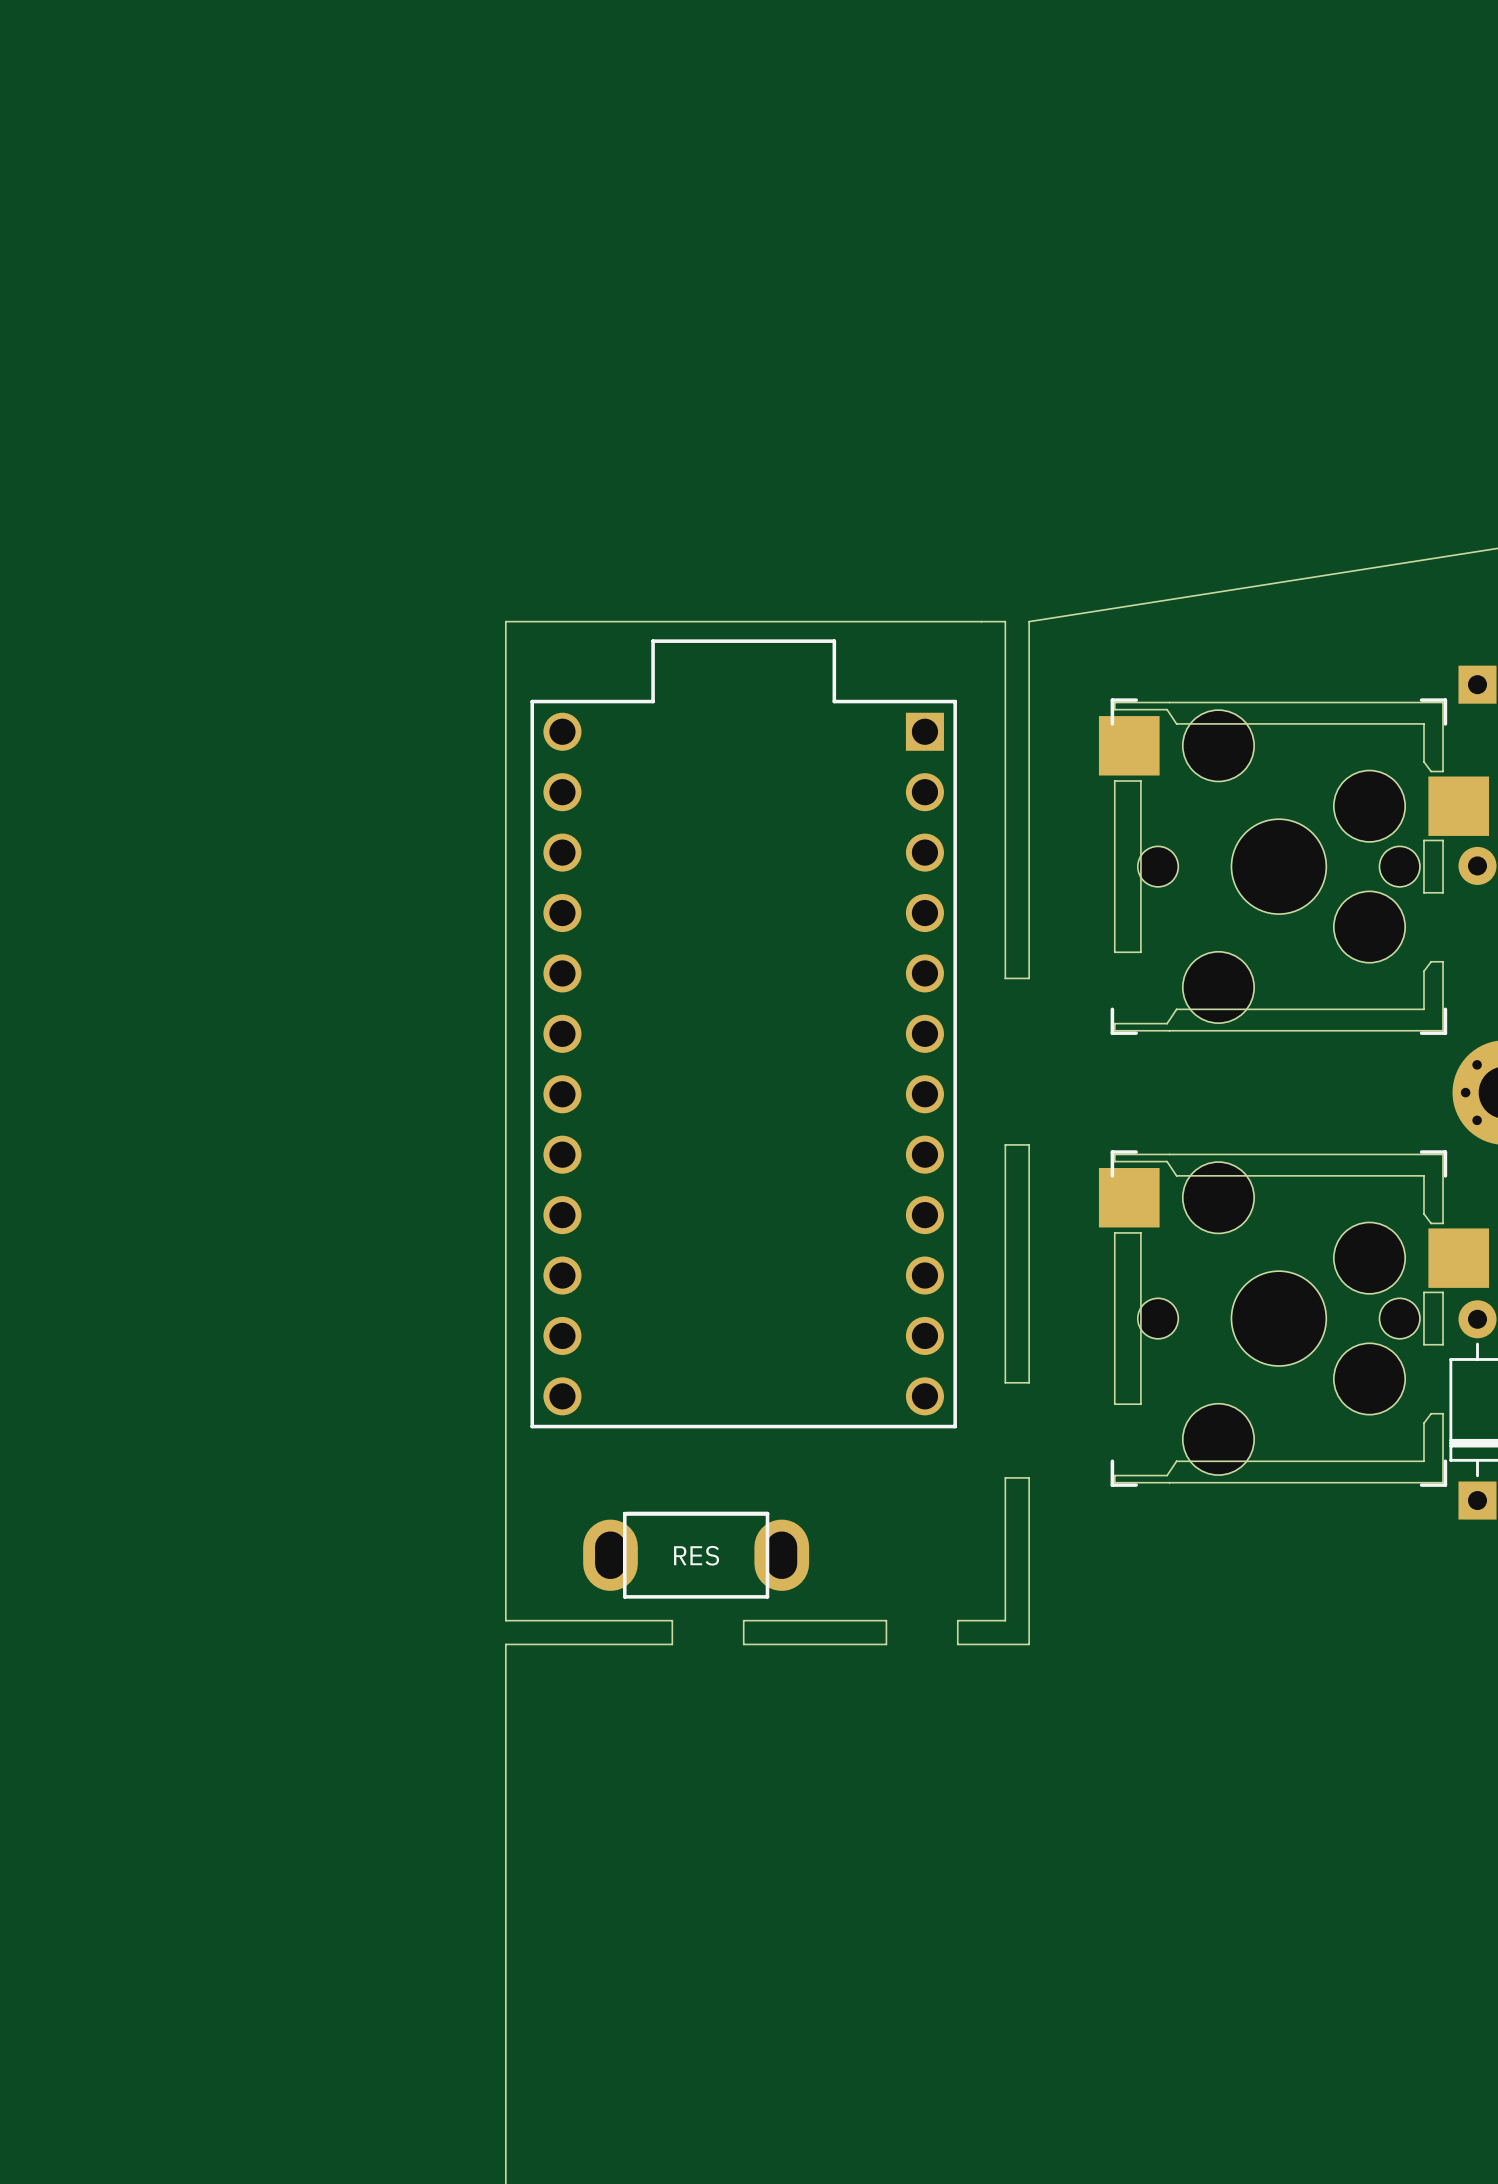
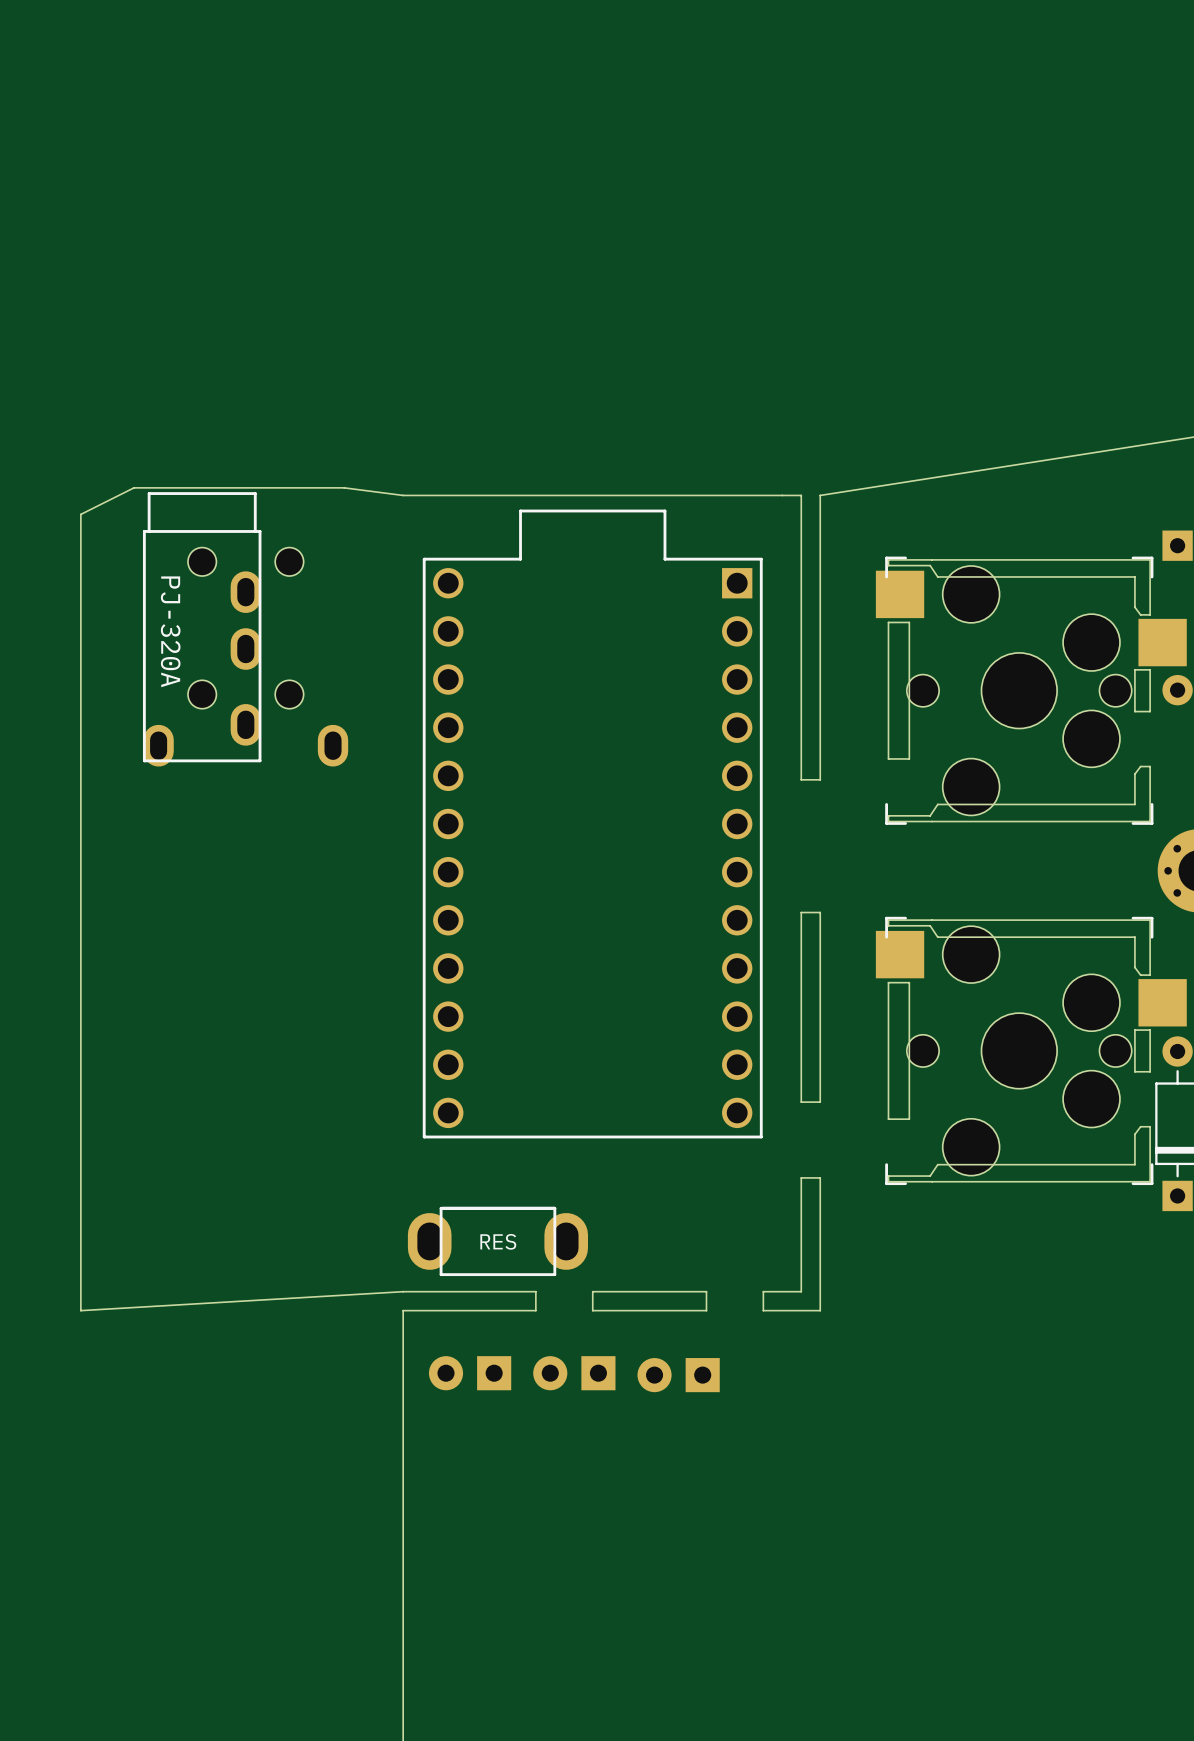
board edge: (505, 621) (505, 1620) -> (403, 495) (344, 487) (133, 487) (80, 514) (80, 1310) (403, 1291)
part: none -> (245, 629)
part position: (696, 1555) -> (497, 1241)
part: none -> (470, 1373)
part: none -> (574, 1373)
part: none -> (678, 1375)

